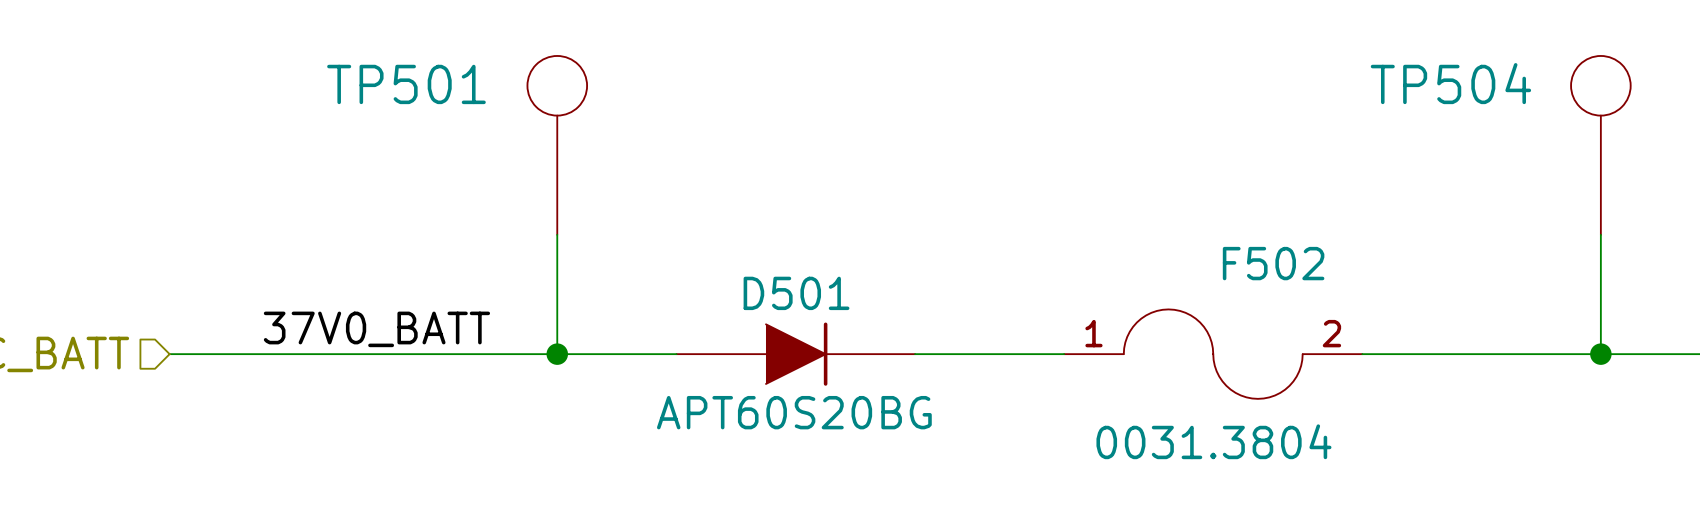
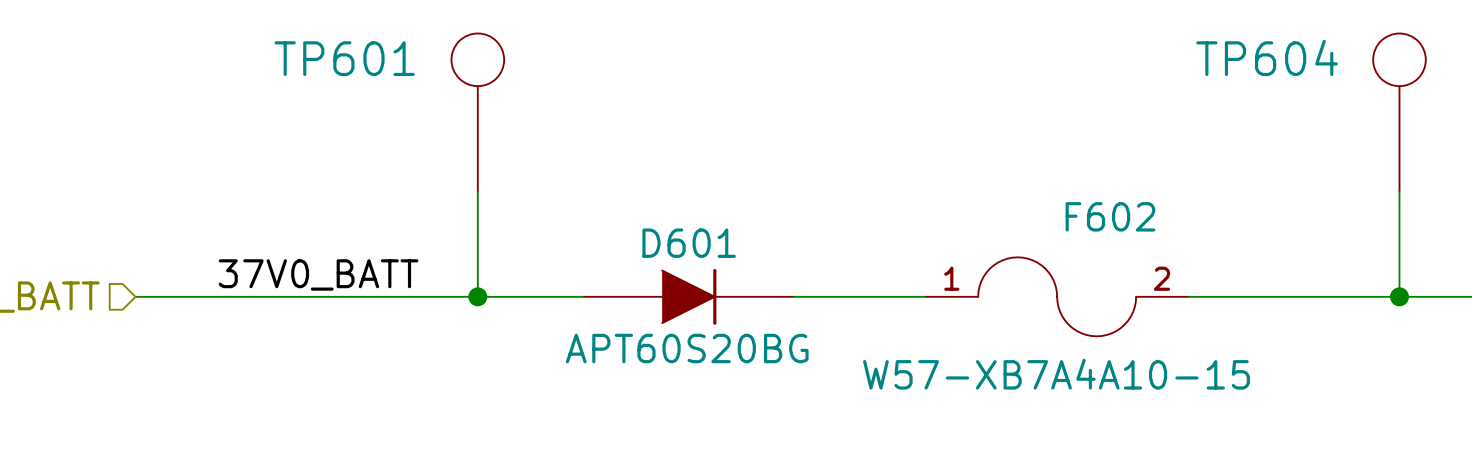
TP504 name: TP504 (1450, 83) -> TP604 (1267, 57)
TP501 name: TP501 (406, 84) -> TP601 (344, 58)
F502 name: F502 (1273, 263) -> F602 (1110, 216)
D501 name: D501 (796, 293) -> D601 (689, 243)
F502 value: 0031.3804 (1213, 441) -> W57-XB7A4A10-15 (1056, 374)

